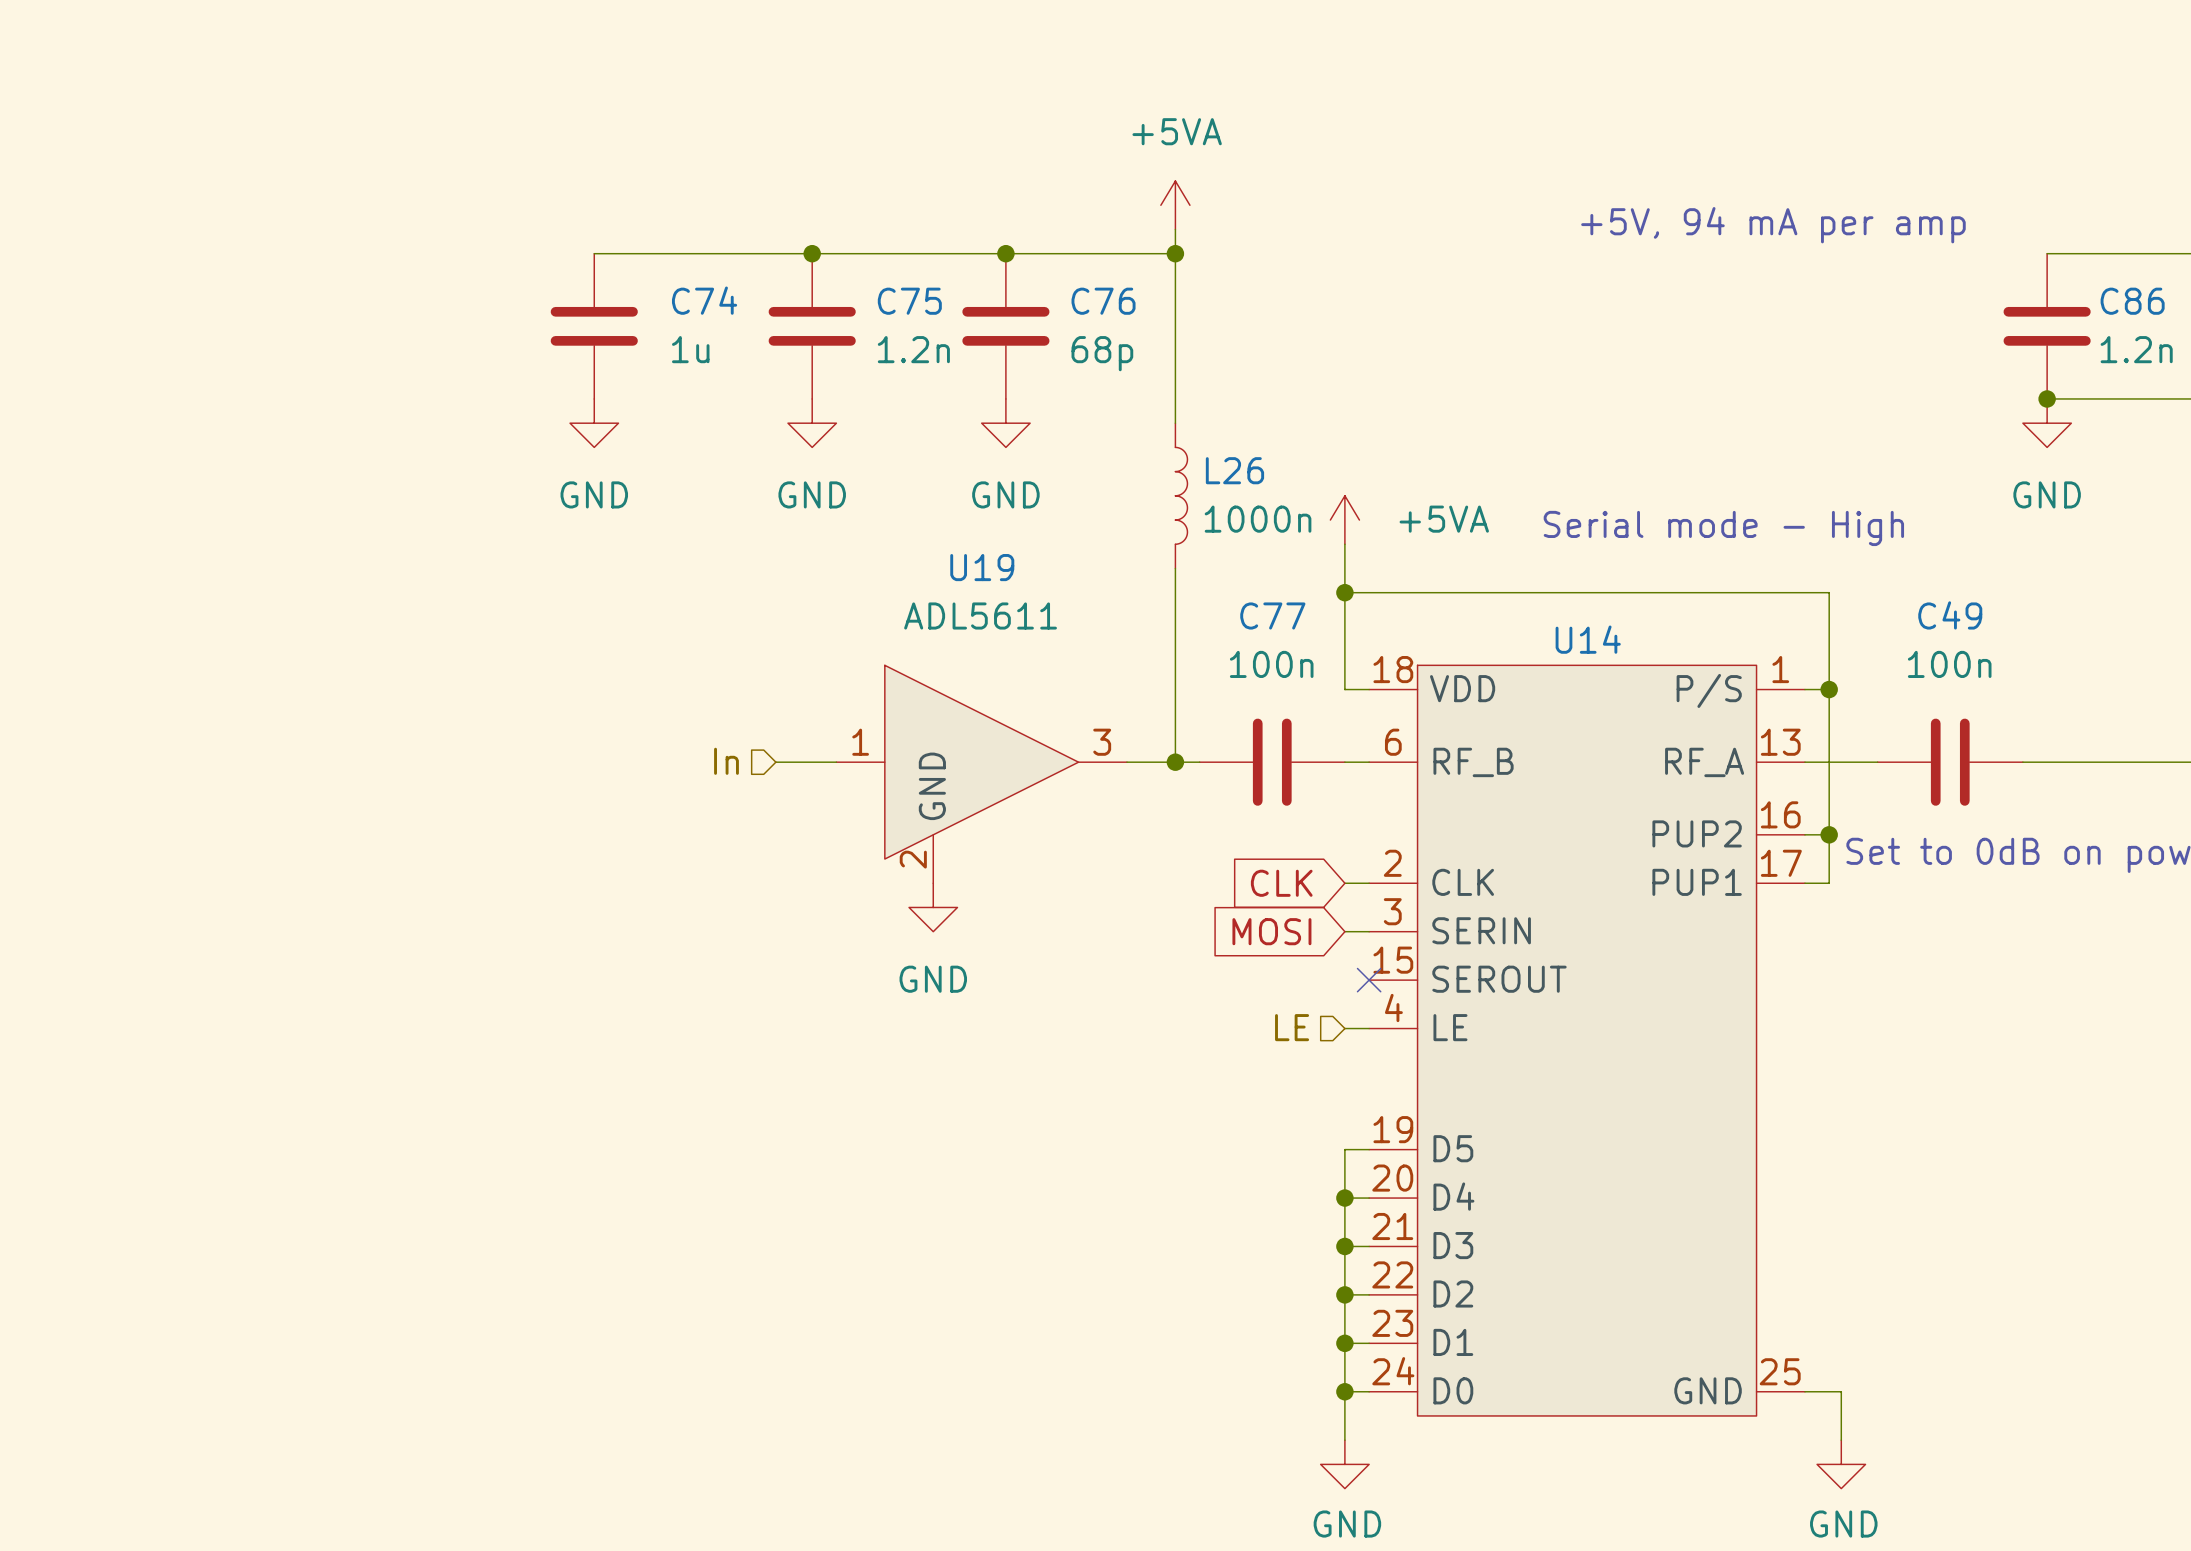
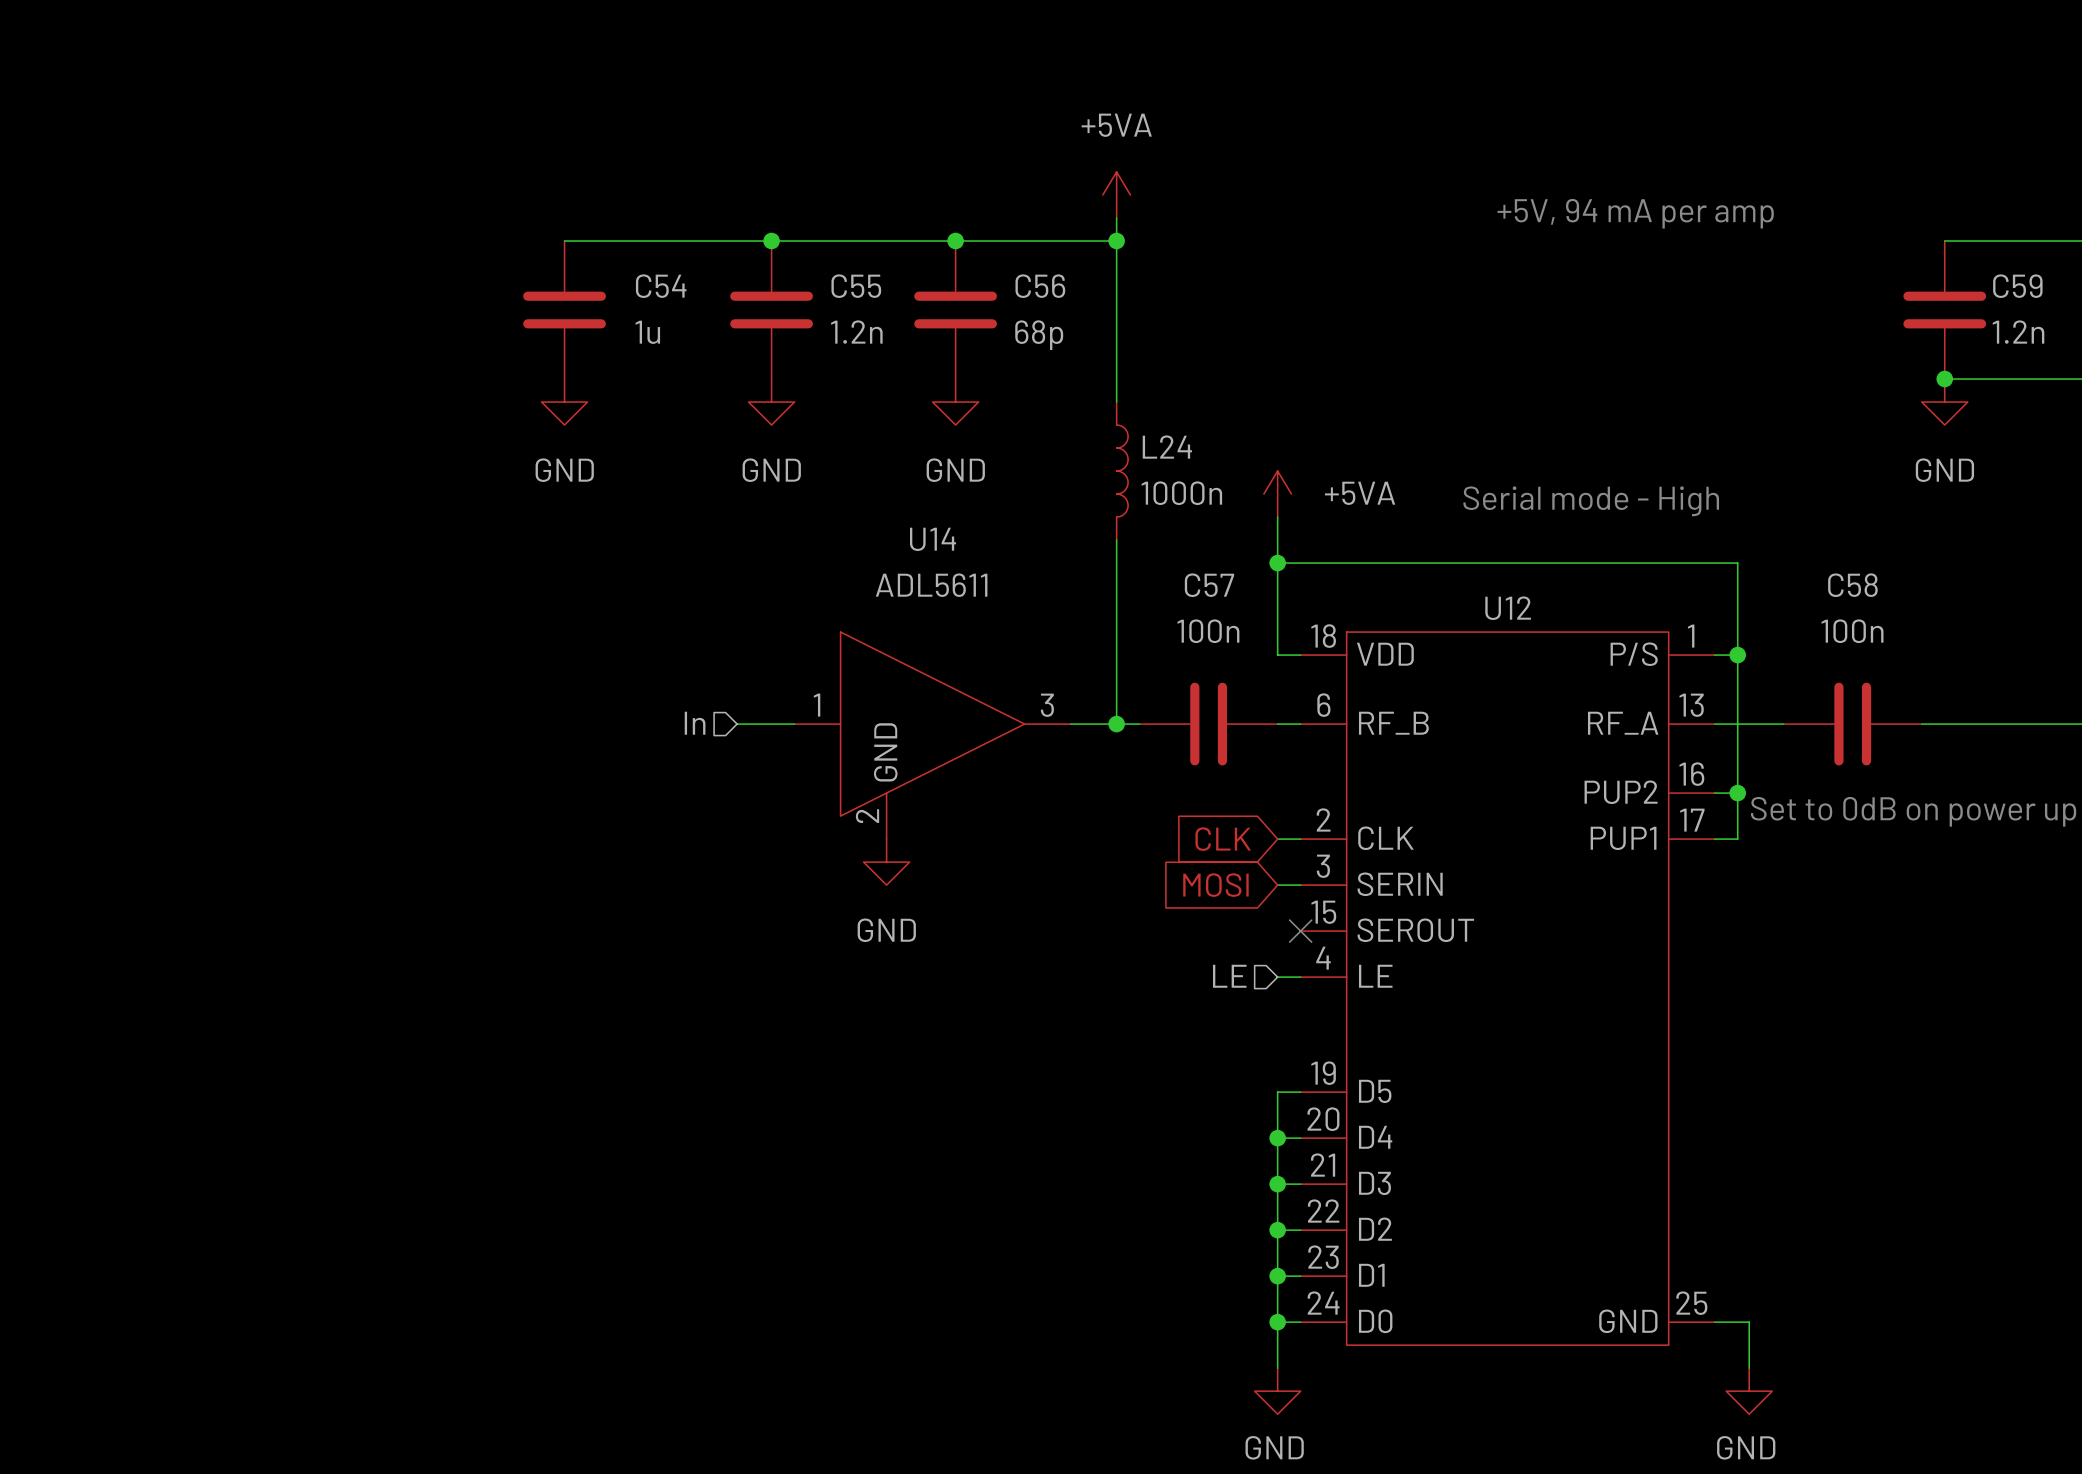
C74 name: C74 (704, 300) -> C54 (661, 286)
C75 name: C75 (909, 301) -> C55 (856, 286)
C76 name: C76 (1103, 301) -> C56 (1040, 286)
C86 name: C86 (2132, 301) -> C59 (2017, 286)
L26 name: L26 (1234, 470) -> L24 (1167, 447)
U19 name: U19 (982, 567) -> U14 (933, 539)
C49 name: C49 (1950, 615) -> C58 (1852, 585)
C77 name: C77 (1272, 616) -> C57 (1209, 585)
U14 name: U14 (1588, 639) -> U12 (1508, 608)

